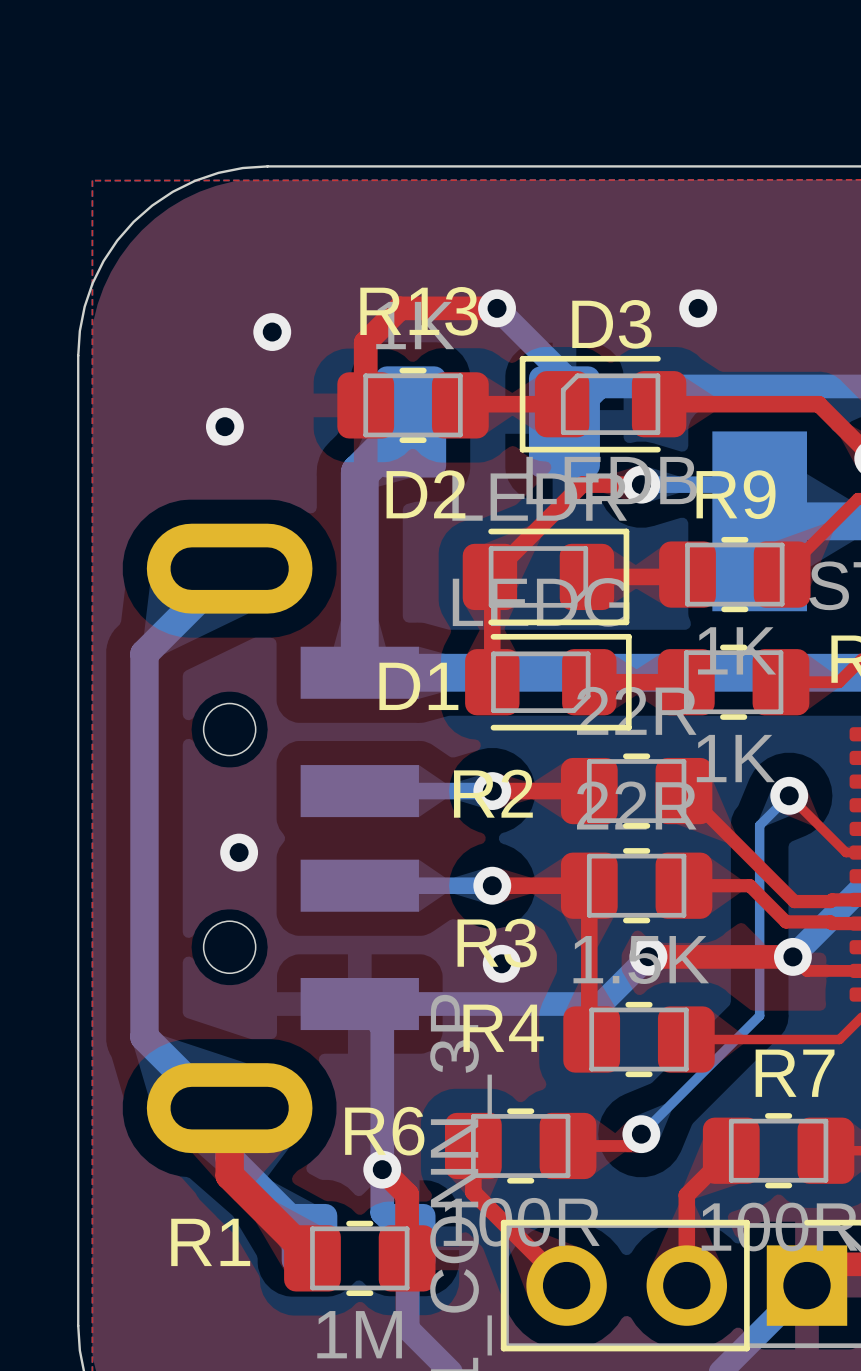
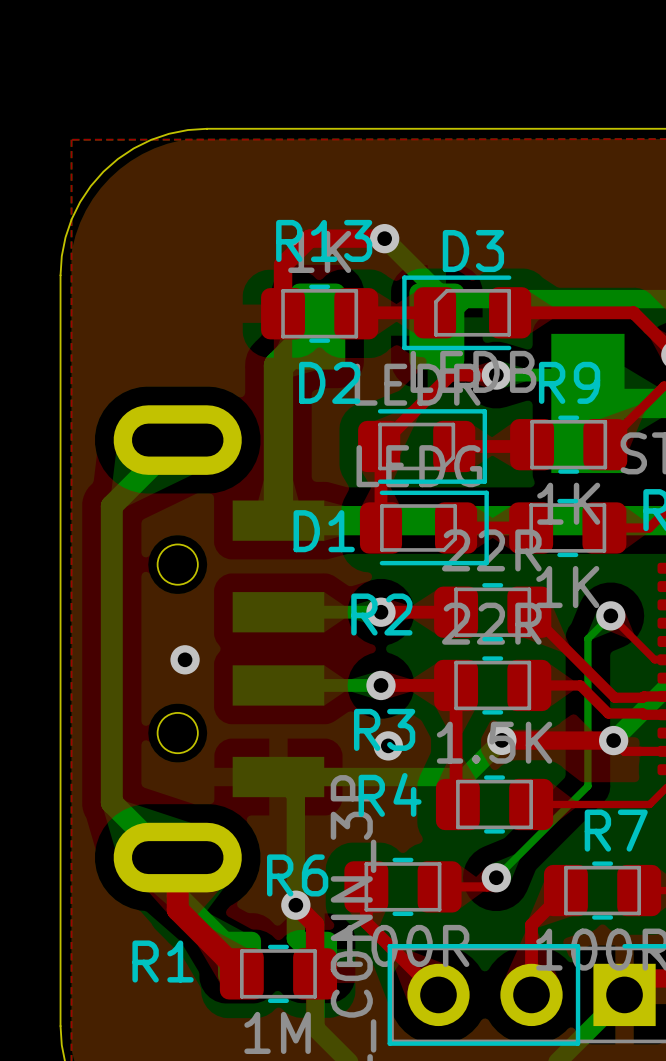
via: (698, 308) -> none
via: (272, 332) -> none
via: (224, 426) -> none

